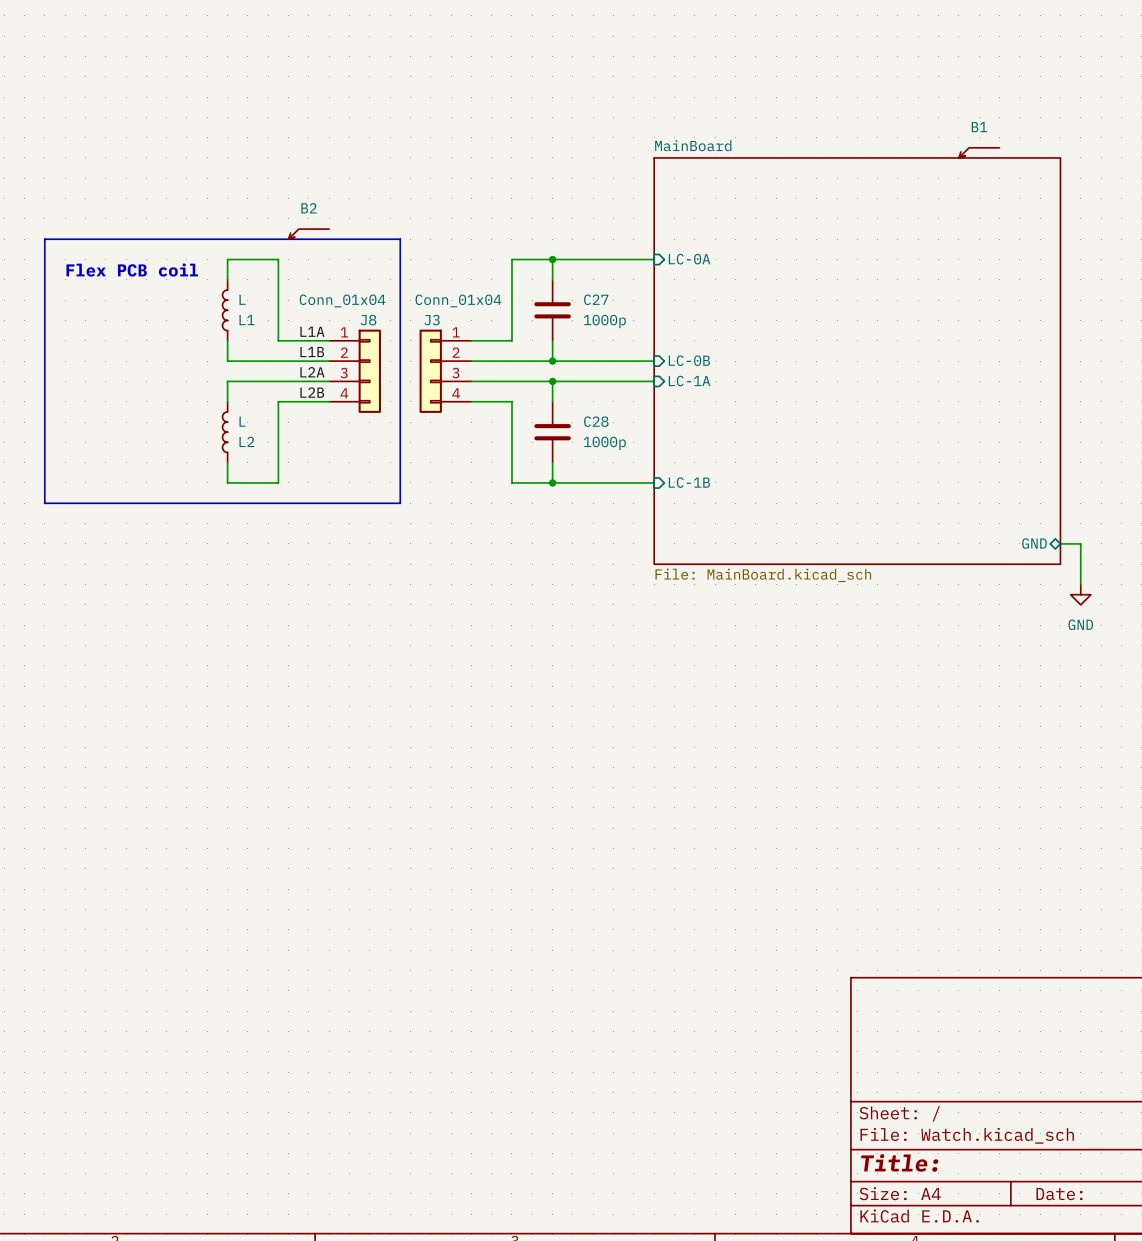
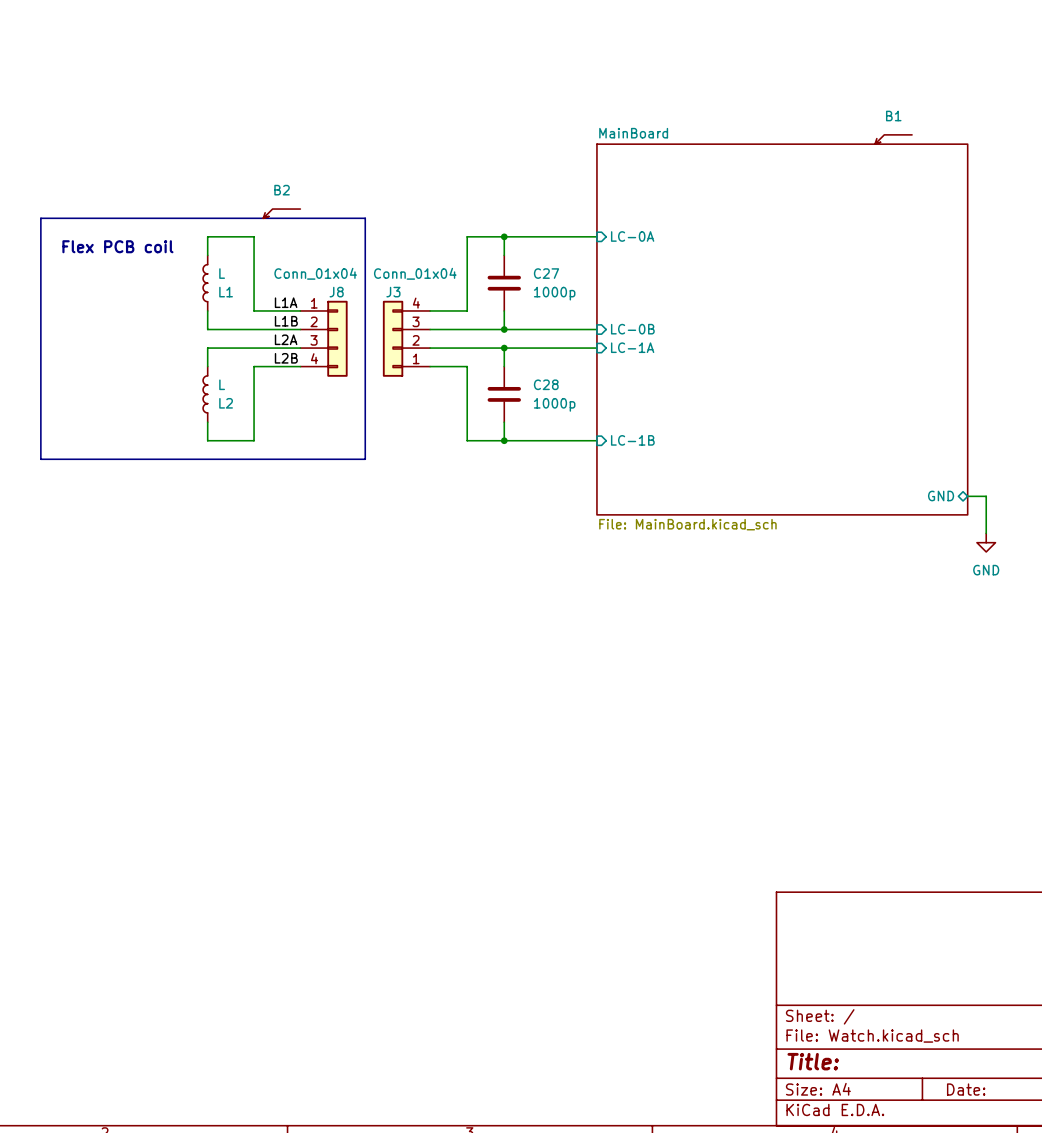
J3 flip: as is (430, 371) -> up-down (393, 338)

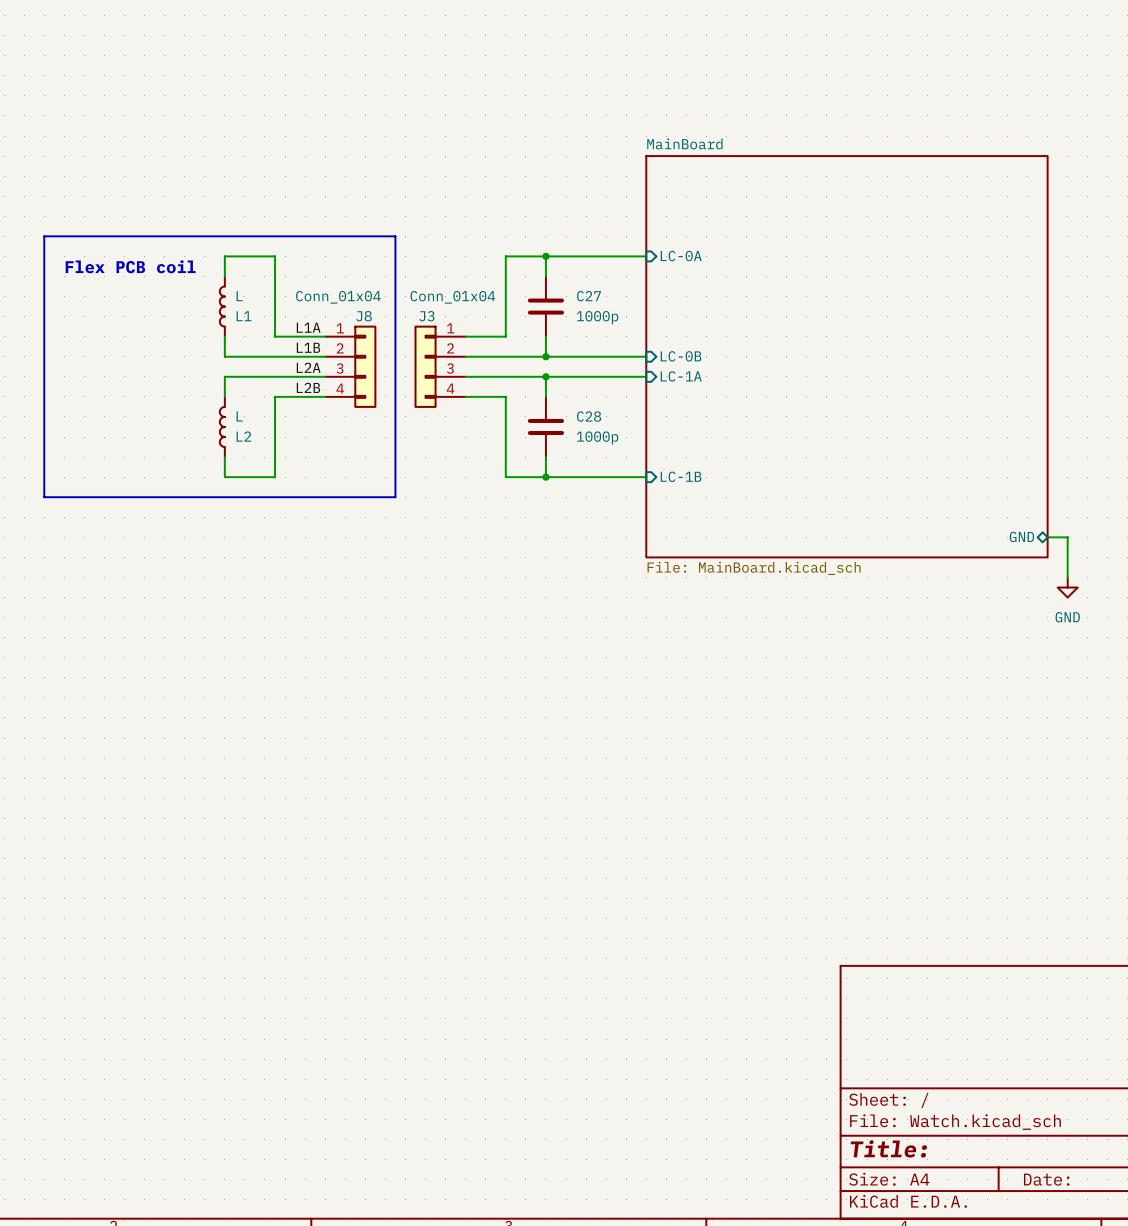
B1: (893, 139) -> none
B2: (281, 213) -> none
J3 flip: as is (393, 338) -> up-down (425, 366)

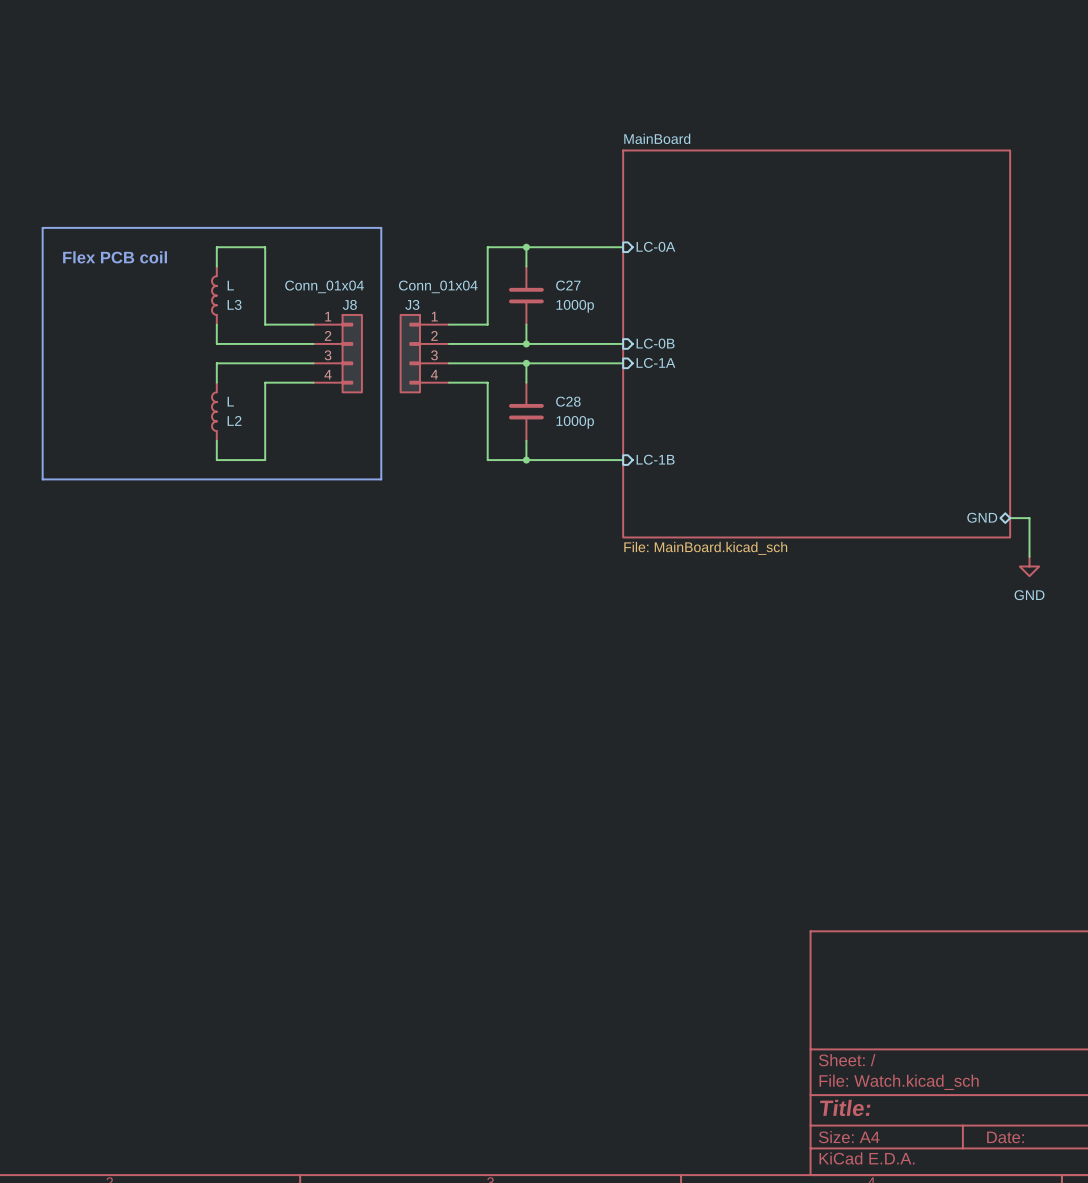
L1 name: L1 (244, 316) -> L3 (234, 304)
label: L1A (308, 327) -> none
label: L1B (308, 347) -> none
label: L2A (308, 367) -> none
label: L2B (308, 387) -> none

